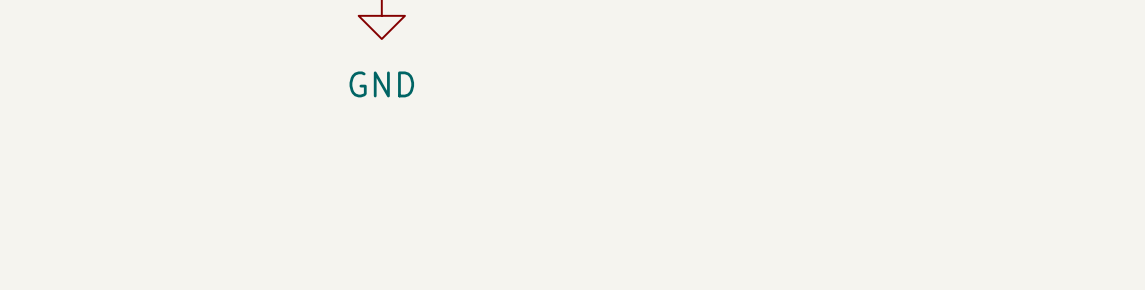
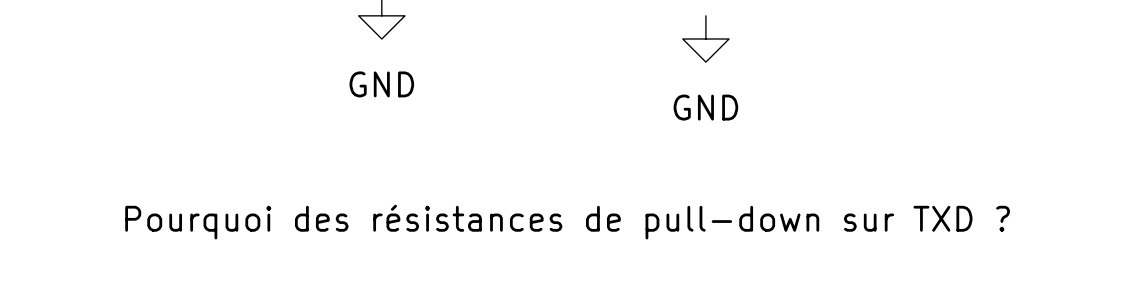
power symbol: none -> GND (705, 38)
text: none -> Pourquoi des résistances de pull-down sur TXD ? (567, 222)

